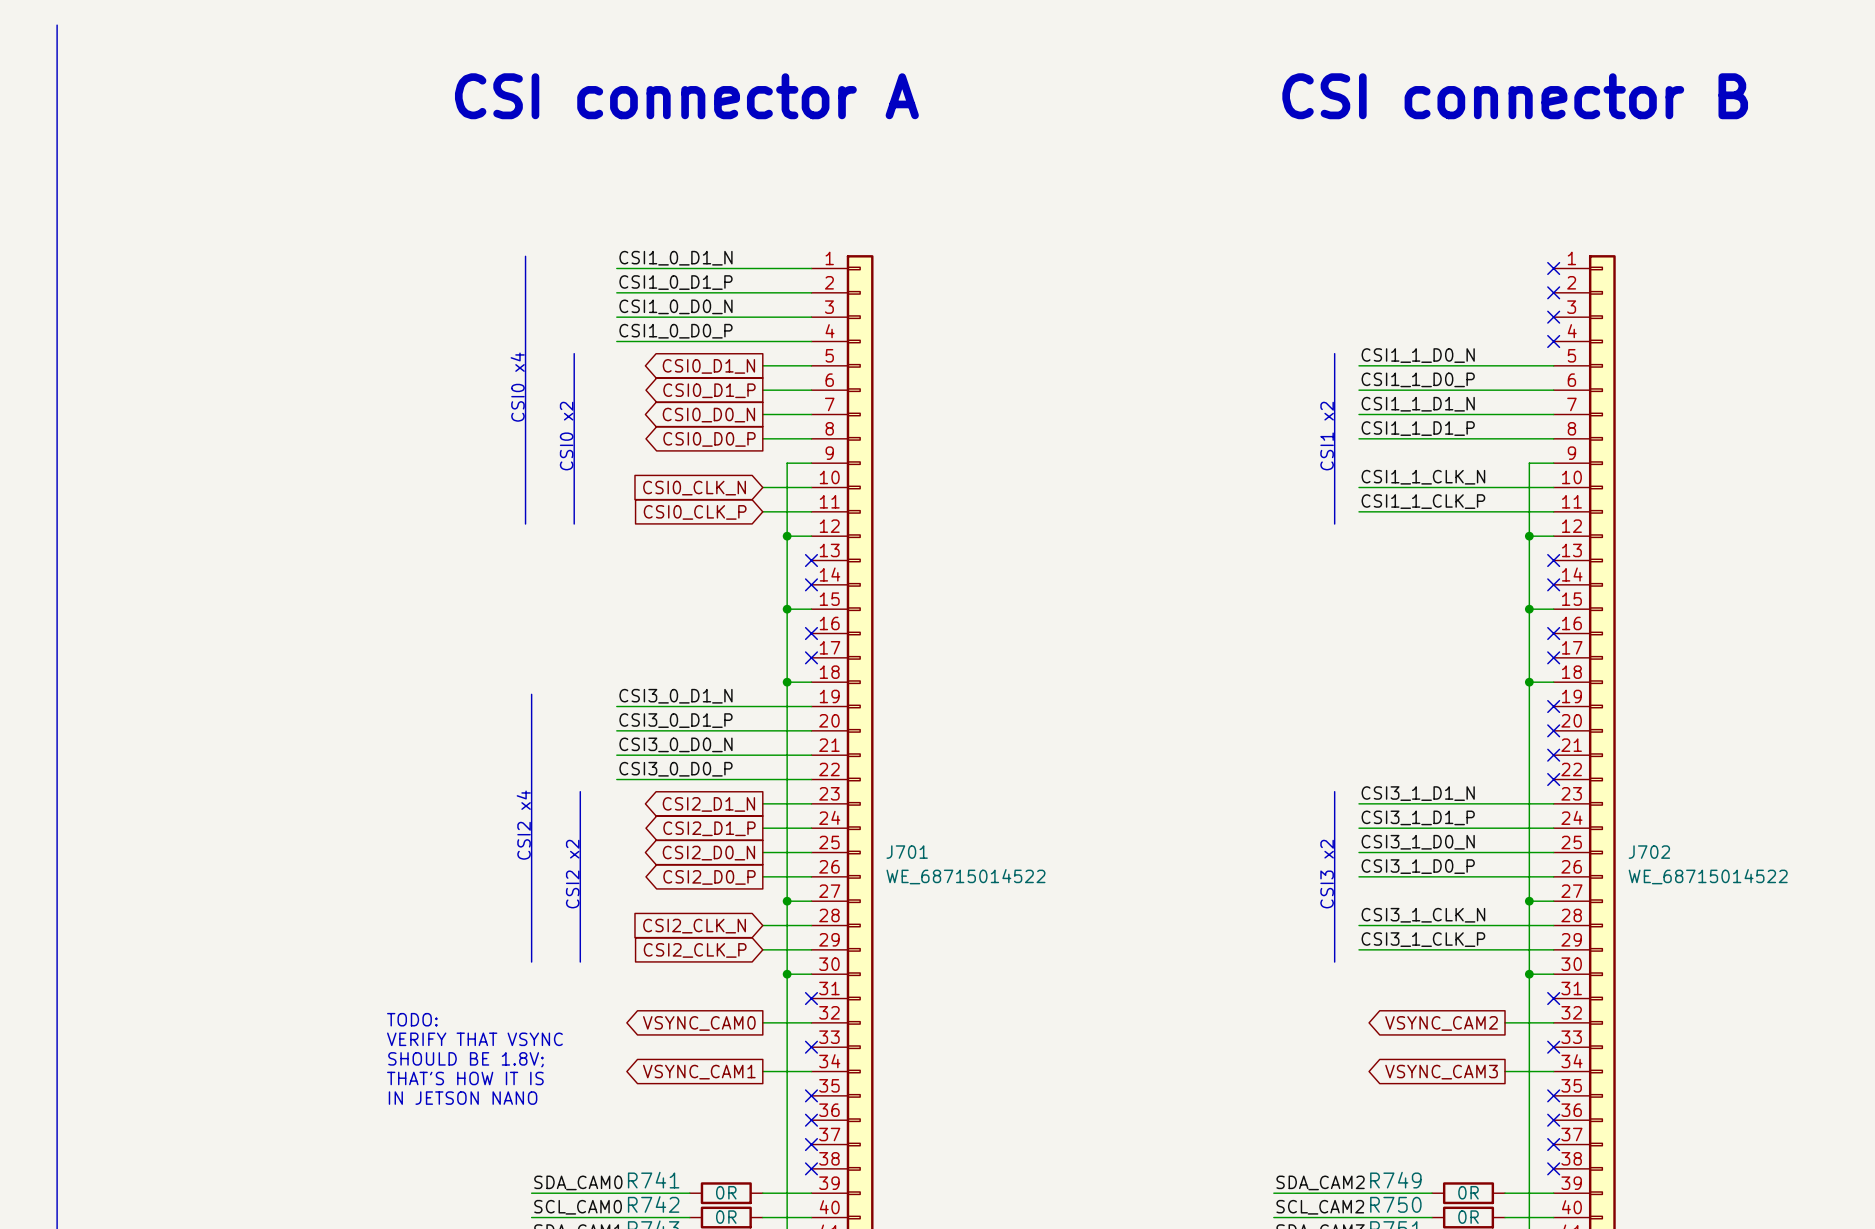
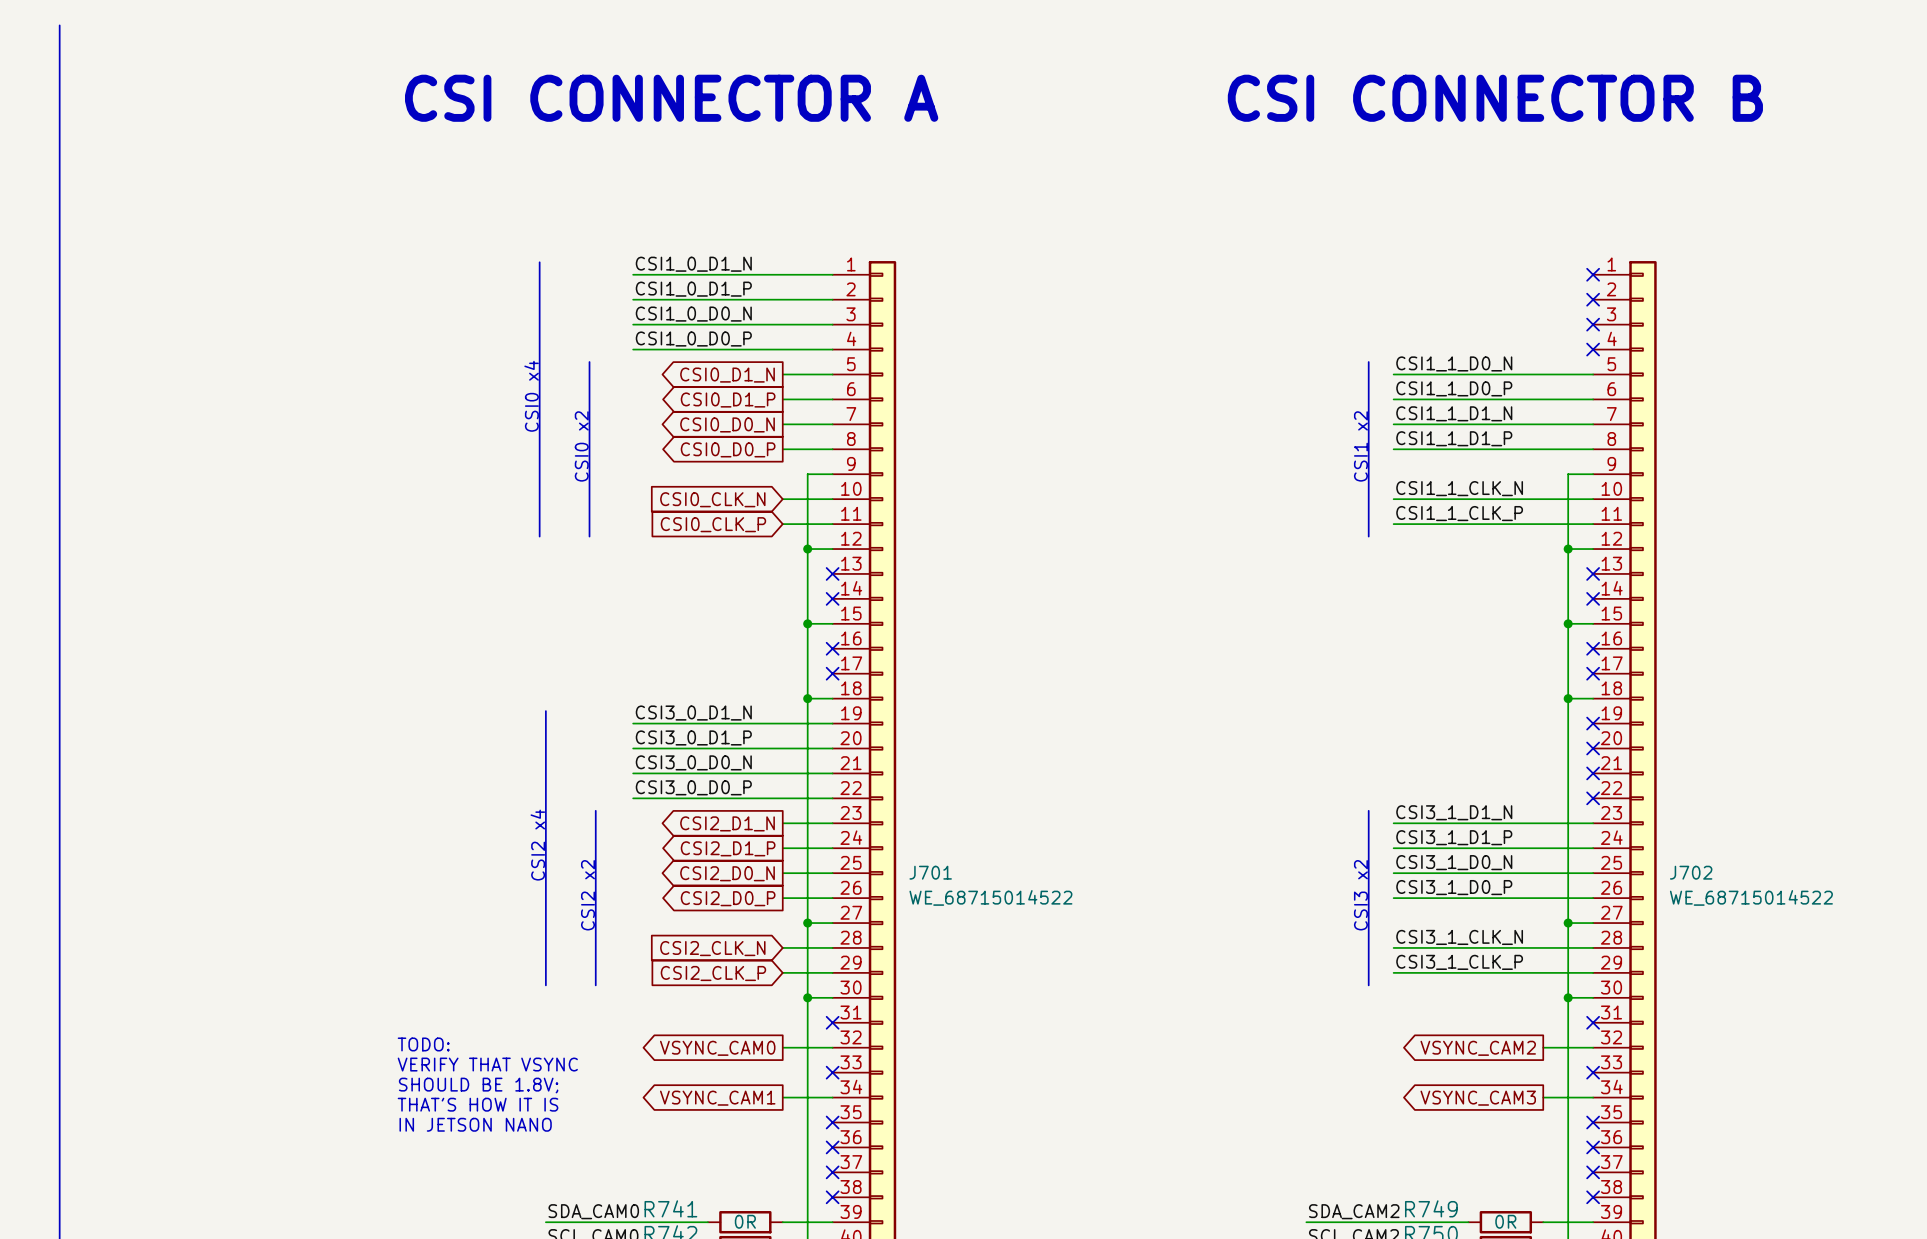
text: none -> CSI CONNECTOR A (671, 98)
text: CSI connector A (686, 96) -> none
text: none -> CSI CONNECTOR B (1495, 98)
text: CSI connector B (1515, 96) -> none

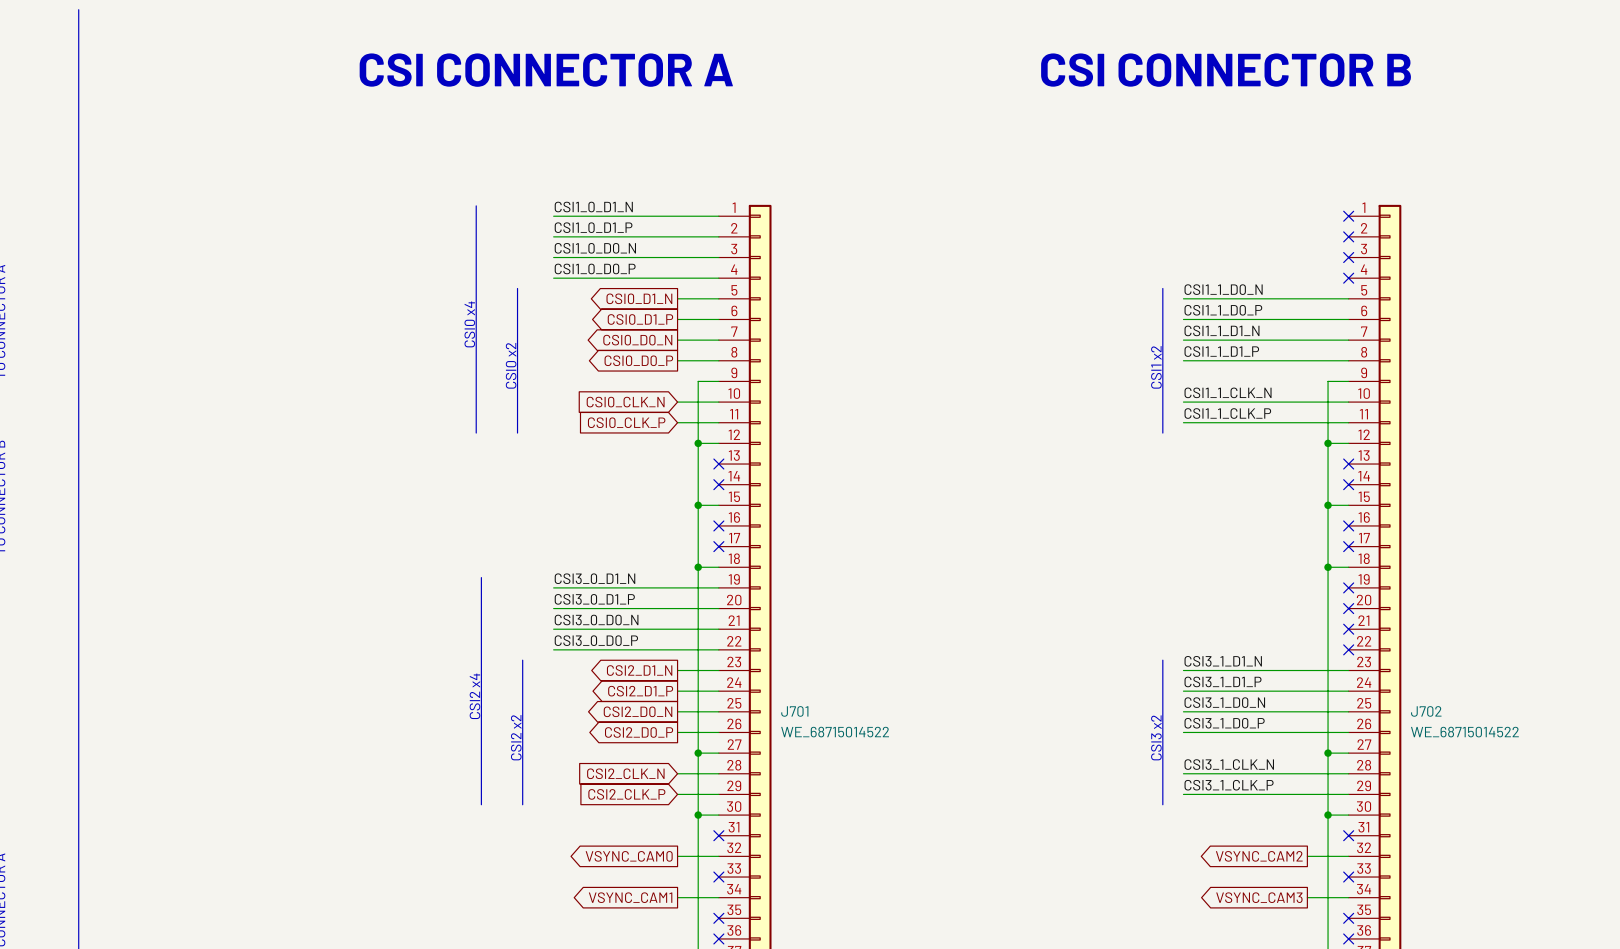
text: TODO: (423, 1044) -> none
text: VERIFY THAT VSYNC (487, 1064) -> none
text: SHOULD BE 1.8V; (478, 1085) -> none
text: THAT'S HOW IT IS (478, 1104) -> none
text: IN JETSON NANO (475, 1124) -> none

